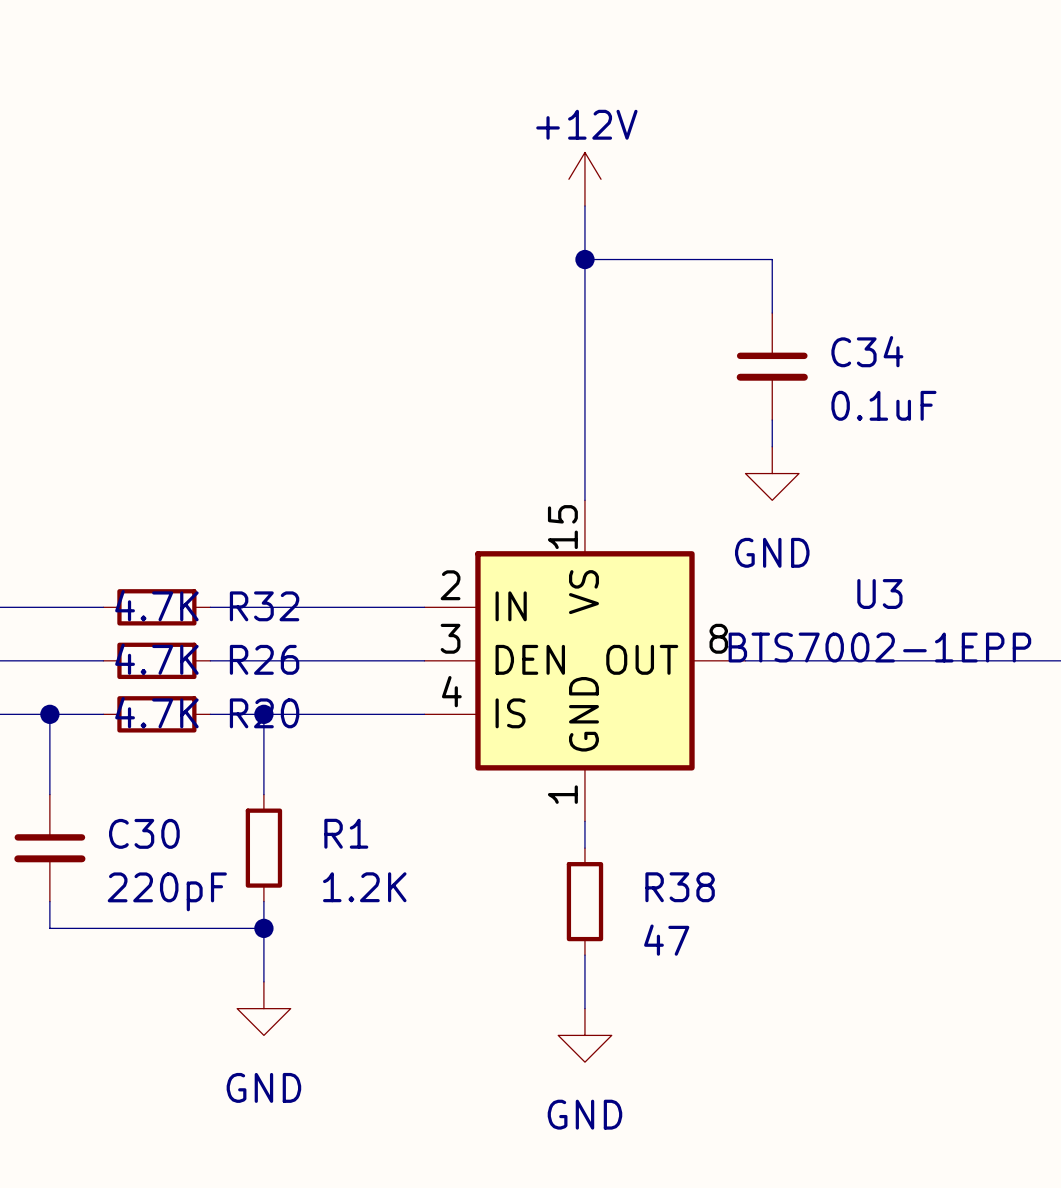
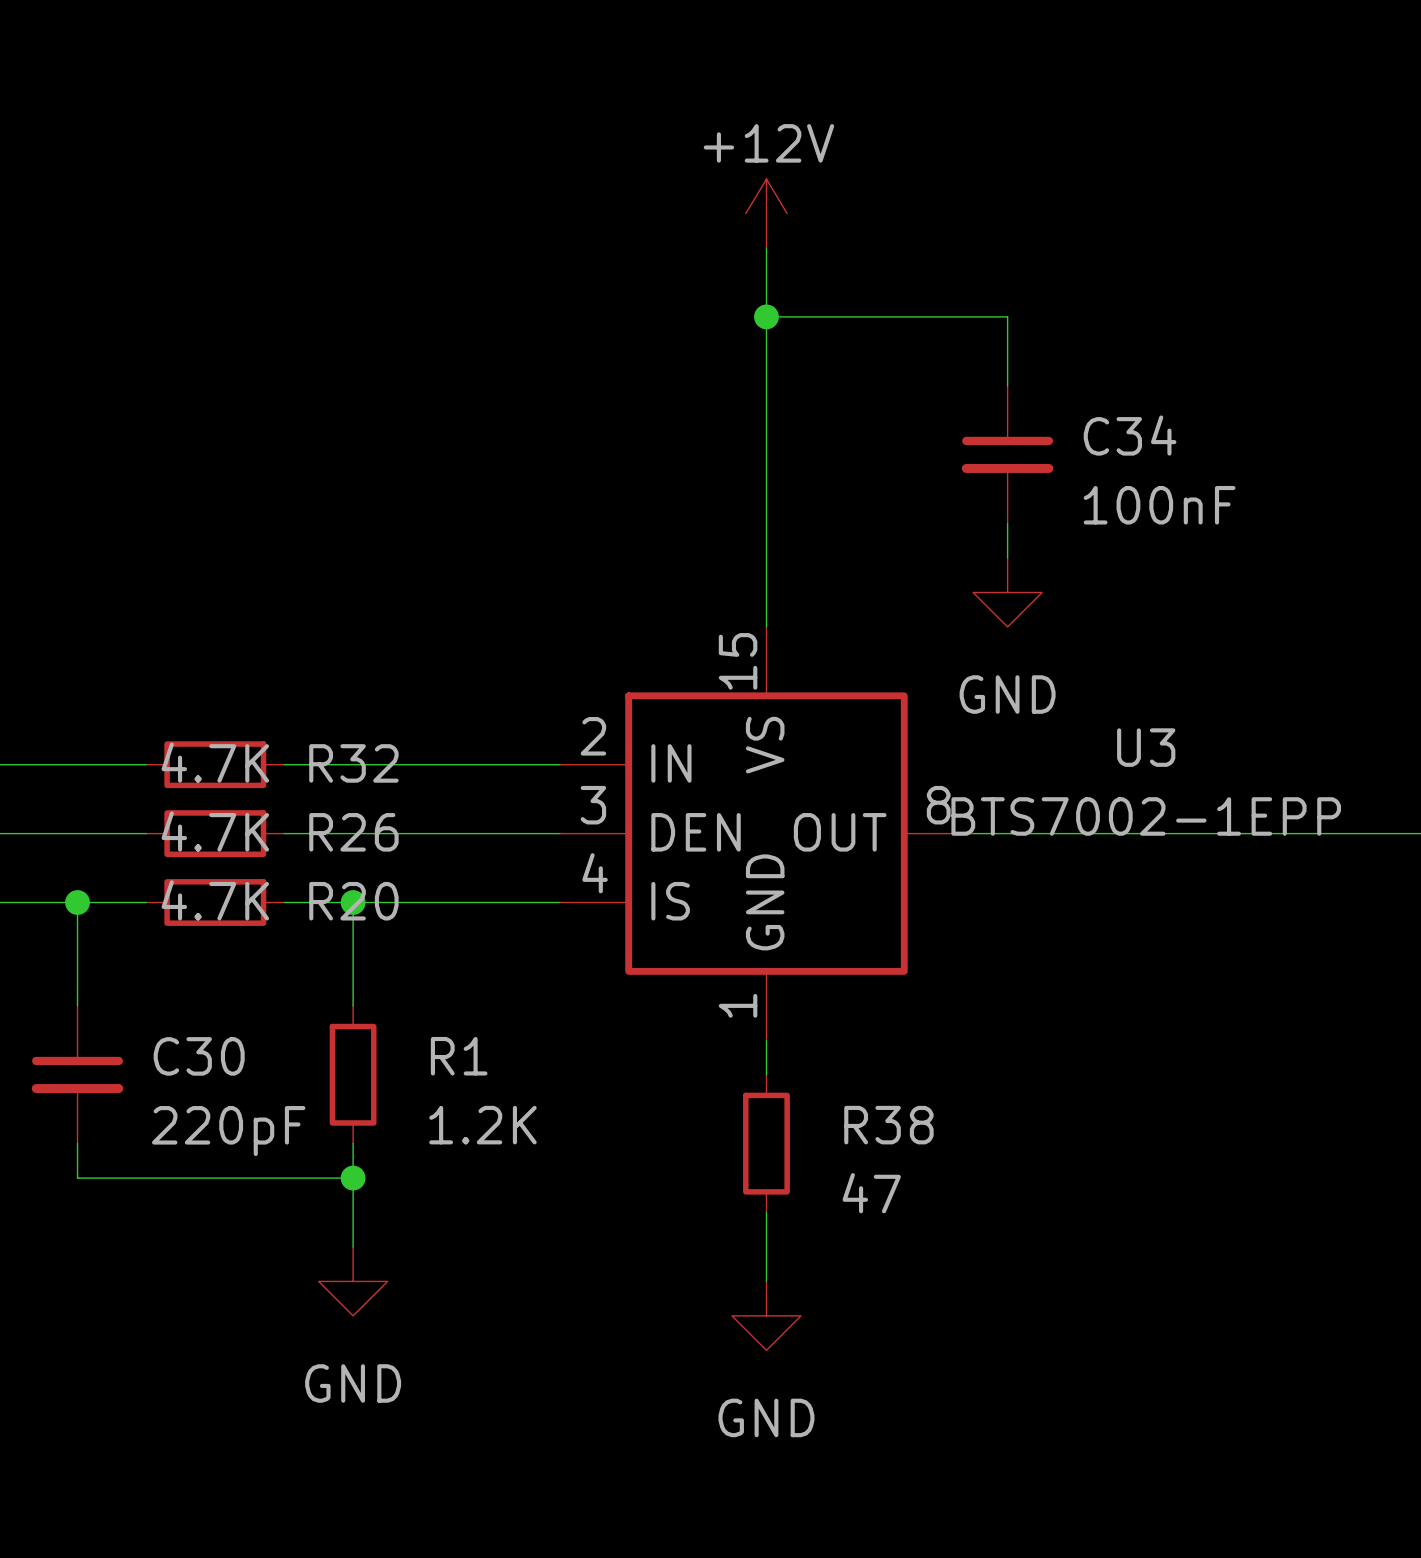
C34 value: 0.1uF (883, 405) -> 100nF (1159, 505)

